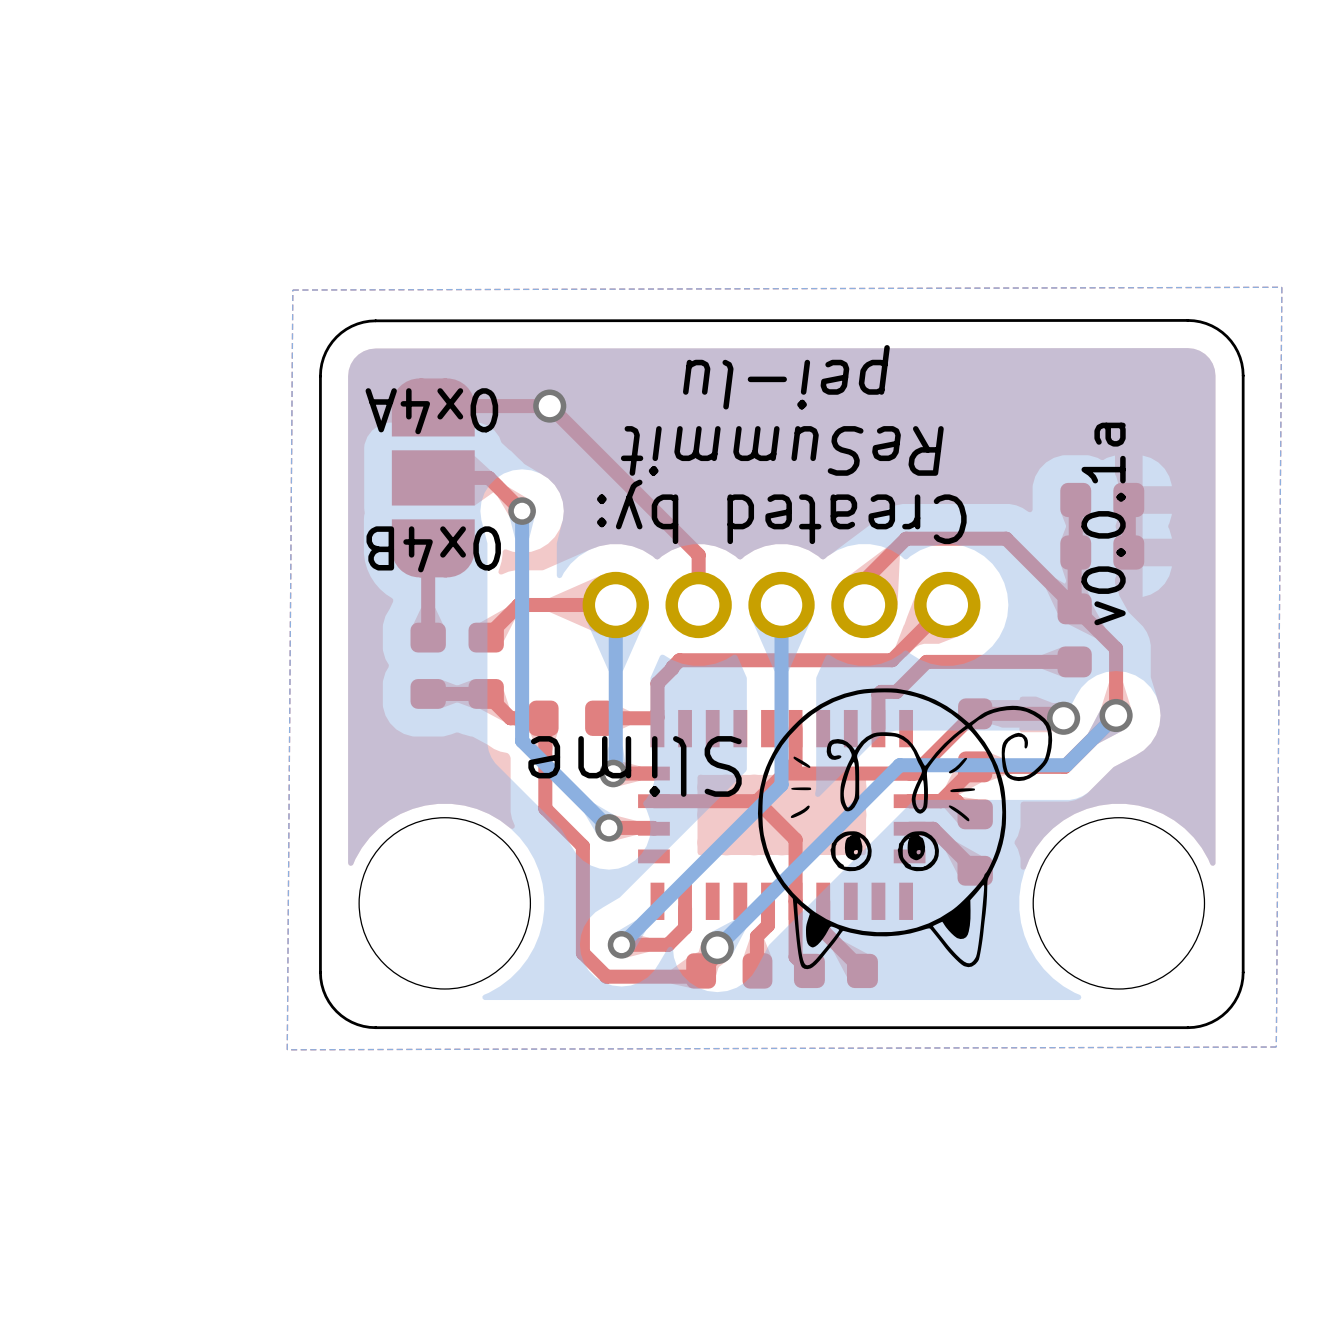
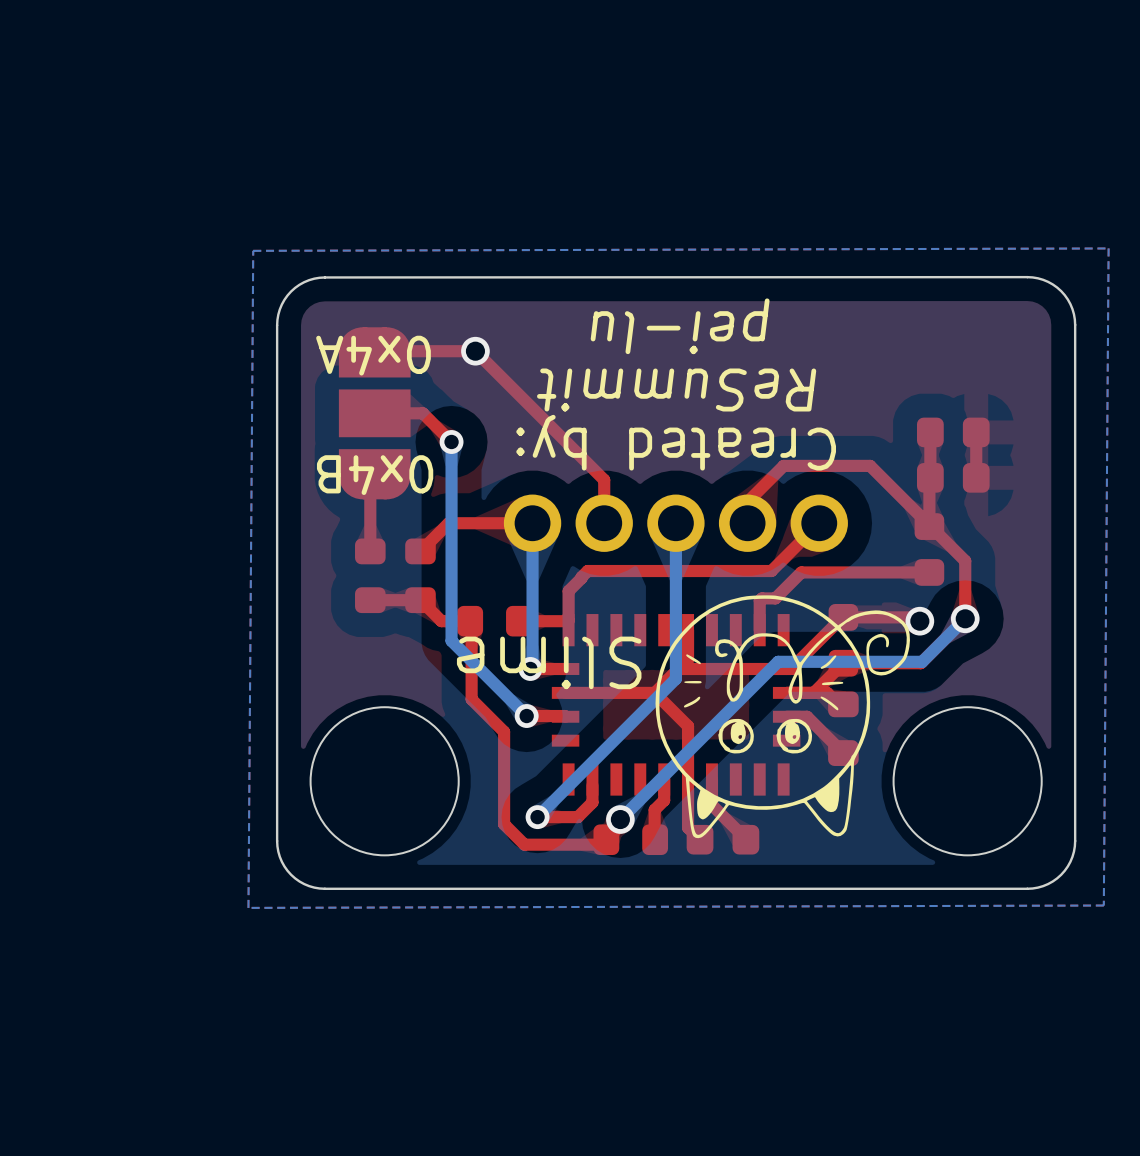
text: v0.0.1a (1103, 523) -> none

